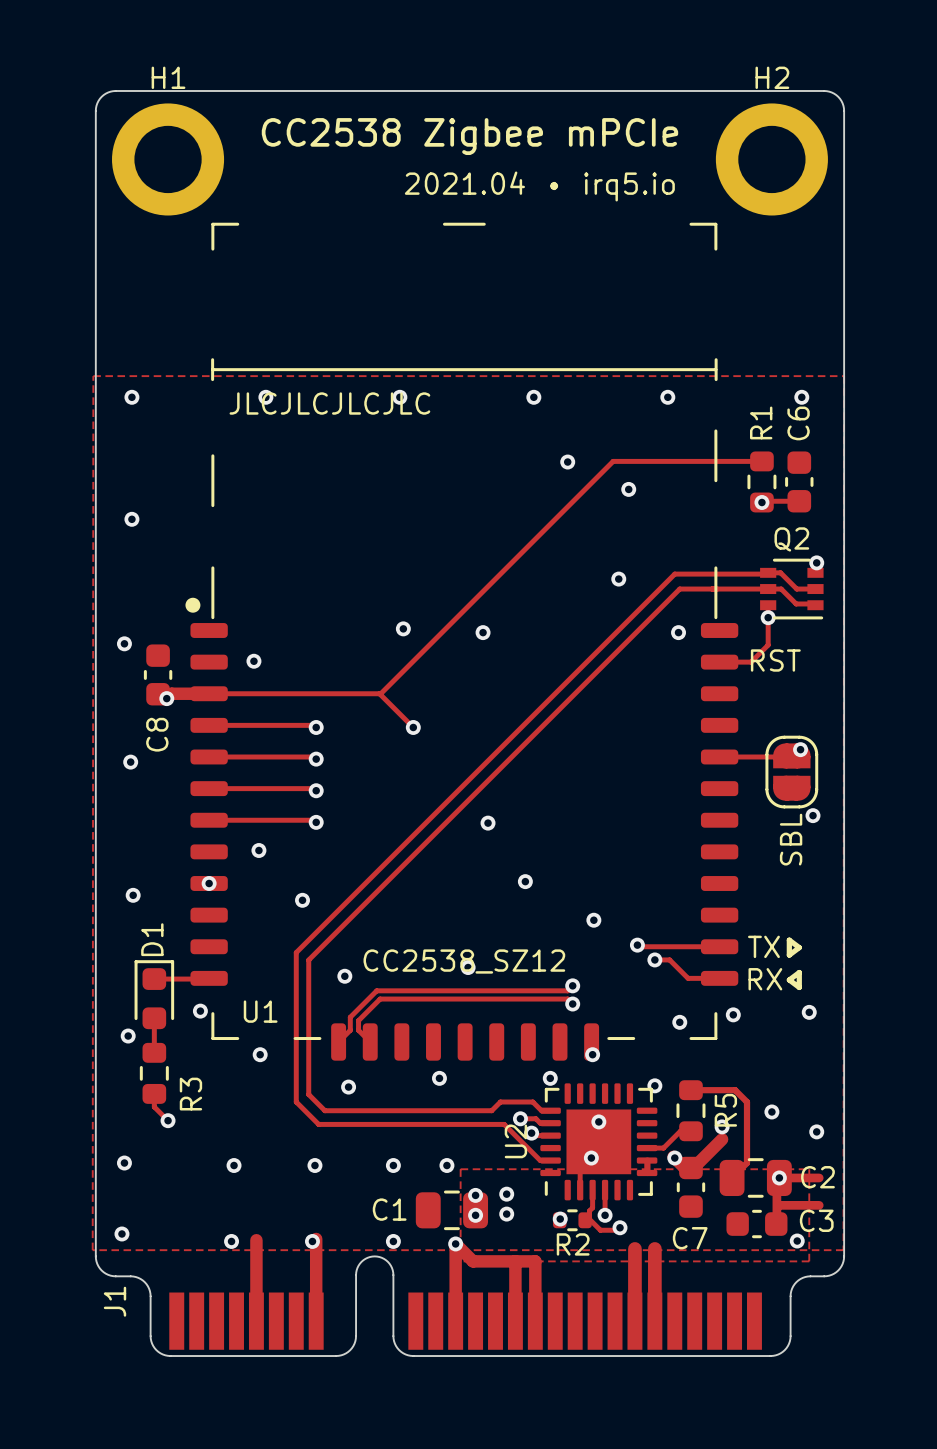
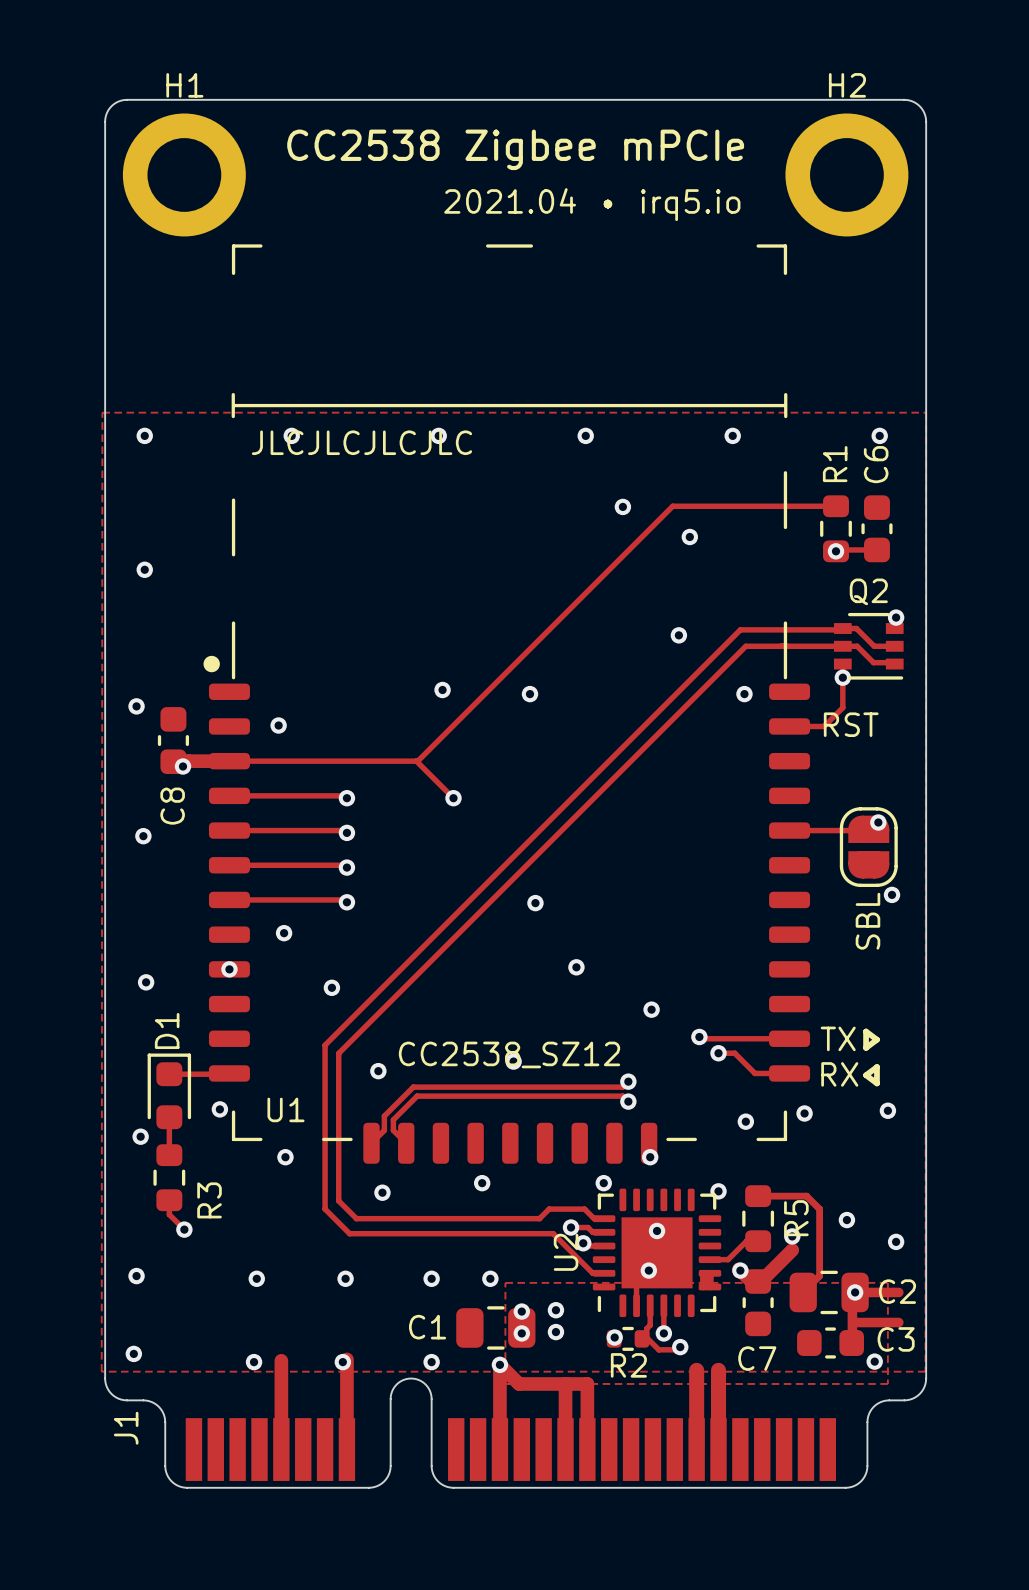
track: none -> (703, 1273) (703, 1286)

